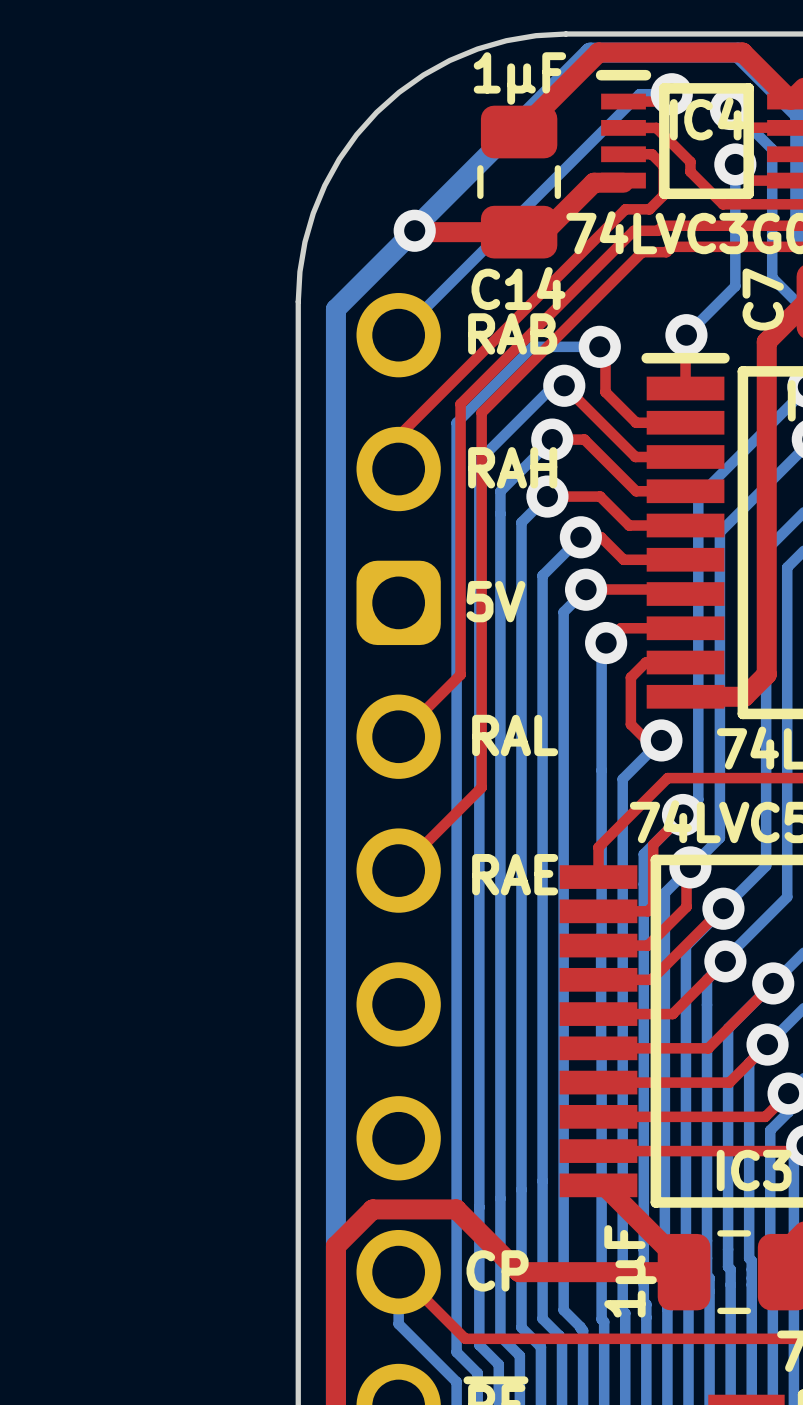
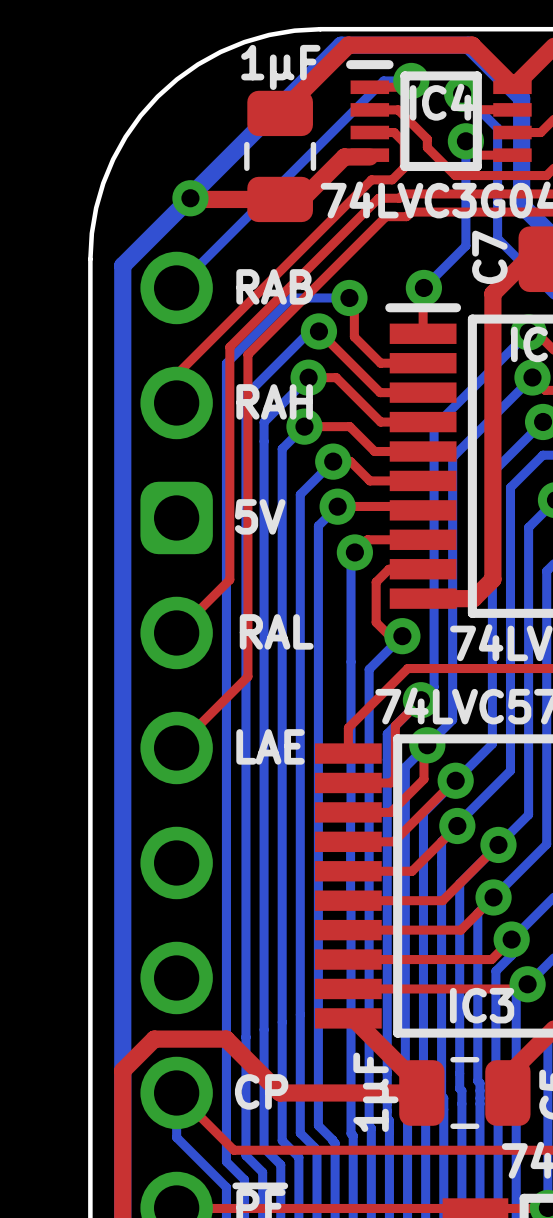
C14 name: C14 (518, 288) -> none
text: RAE (515, 874) -> LAE (270, 746)

